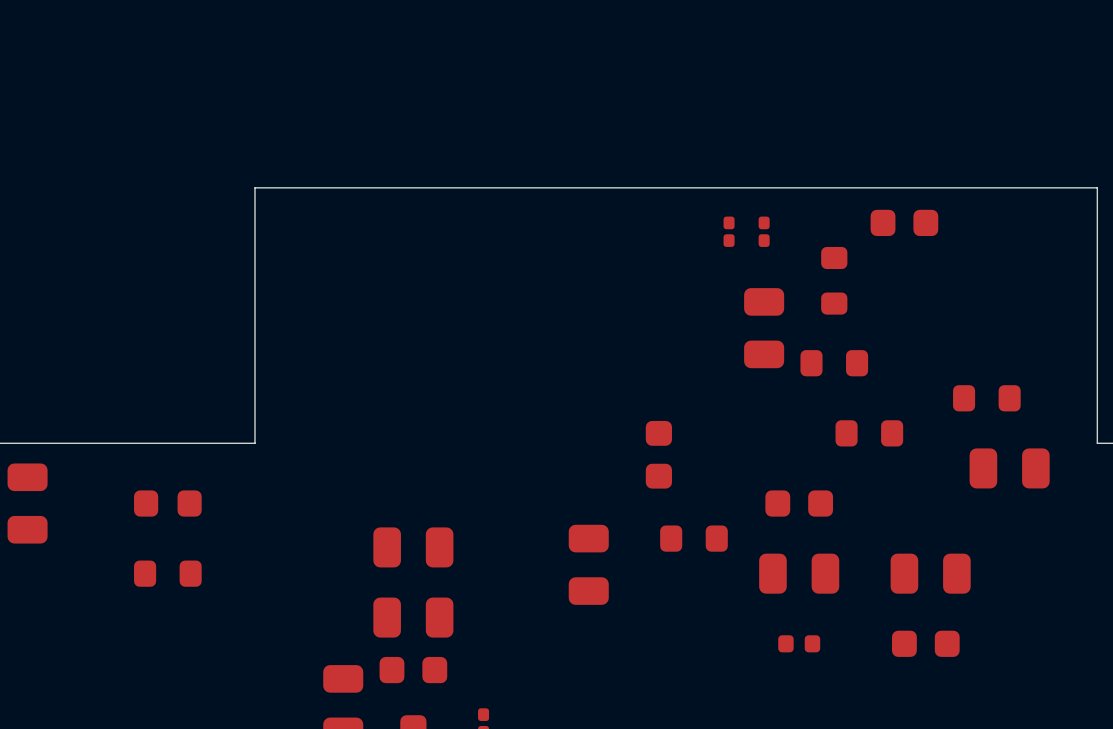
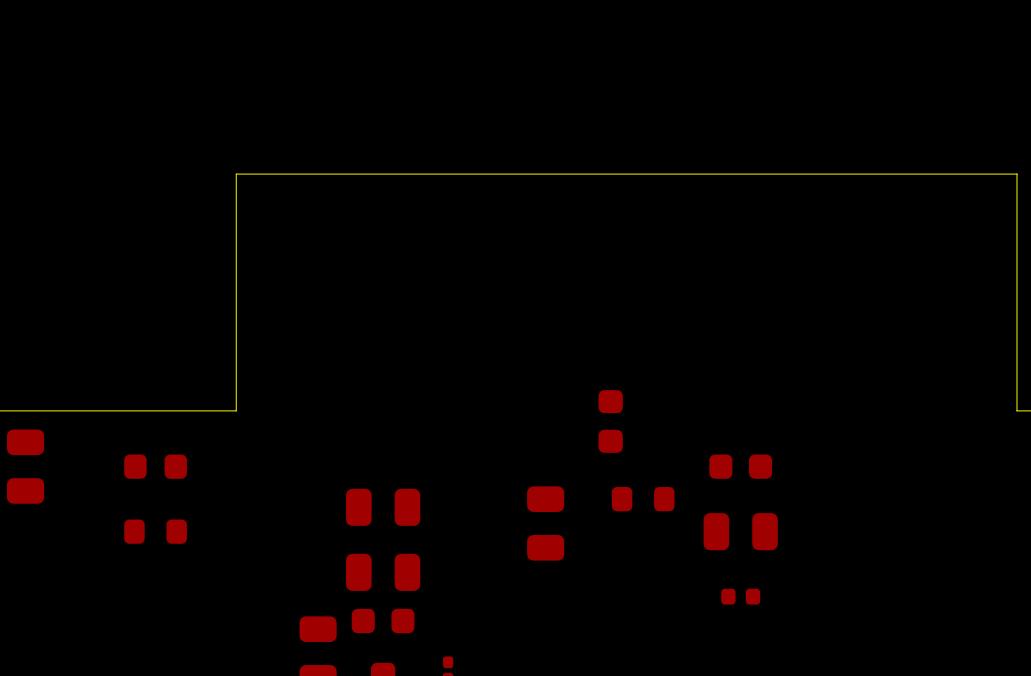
part: (904, 222) -> none
part: (729, 231) -> none
part: (764, 231) -> none
part: (834, 280) -> none
part: (764, 328) -> none
part: (834, 363) -> none
part: (986, 398) -> none
part: (869, 433) -> none
part: (1009, 468) -> none
part: (930, 573) -> none
part: (925, 643) -> none

